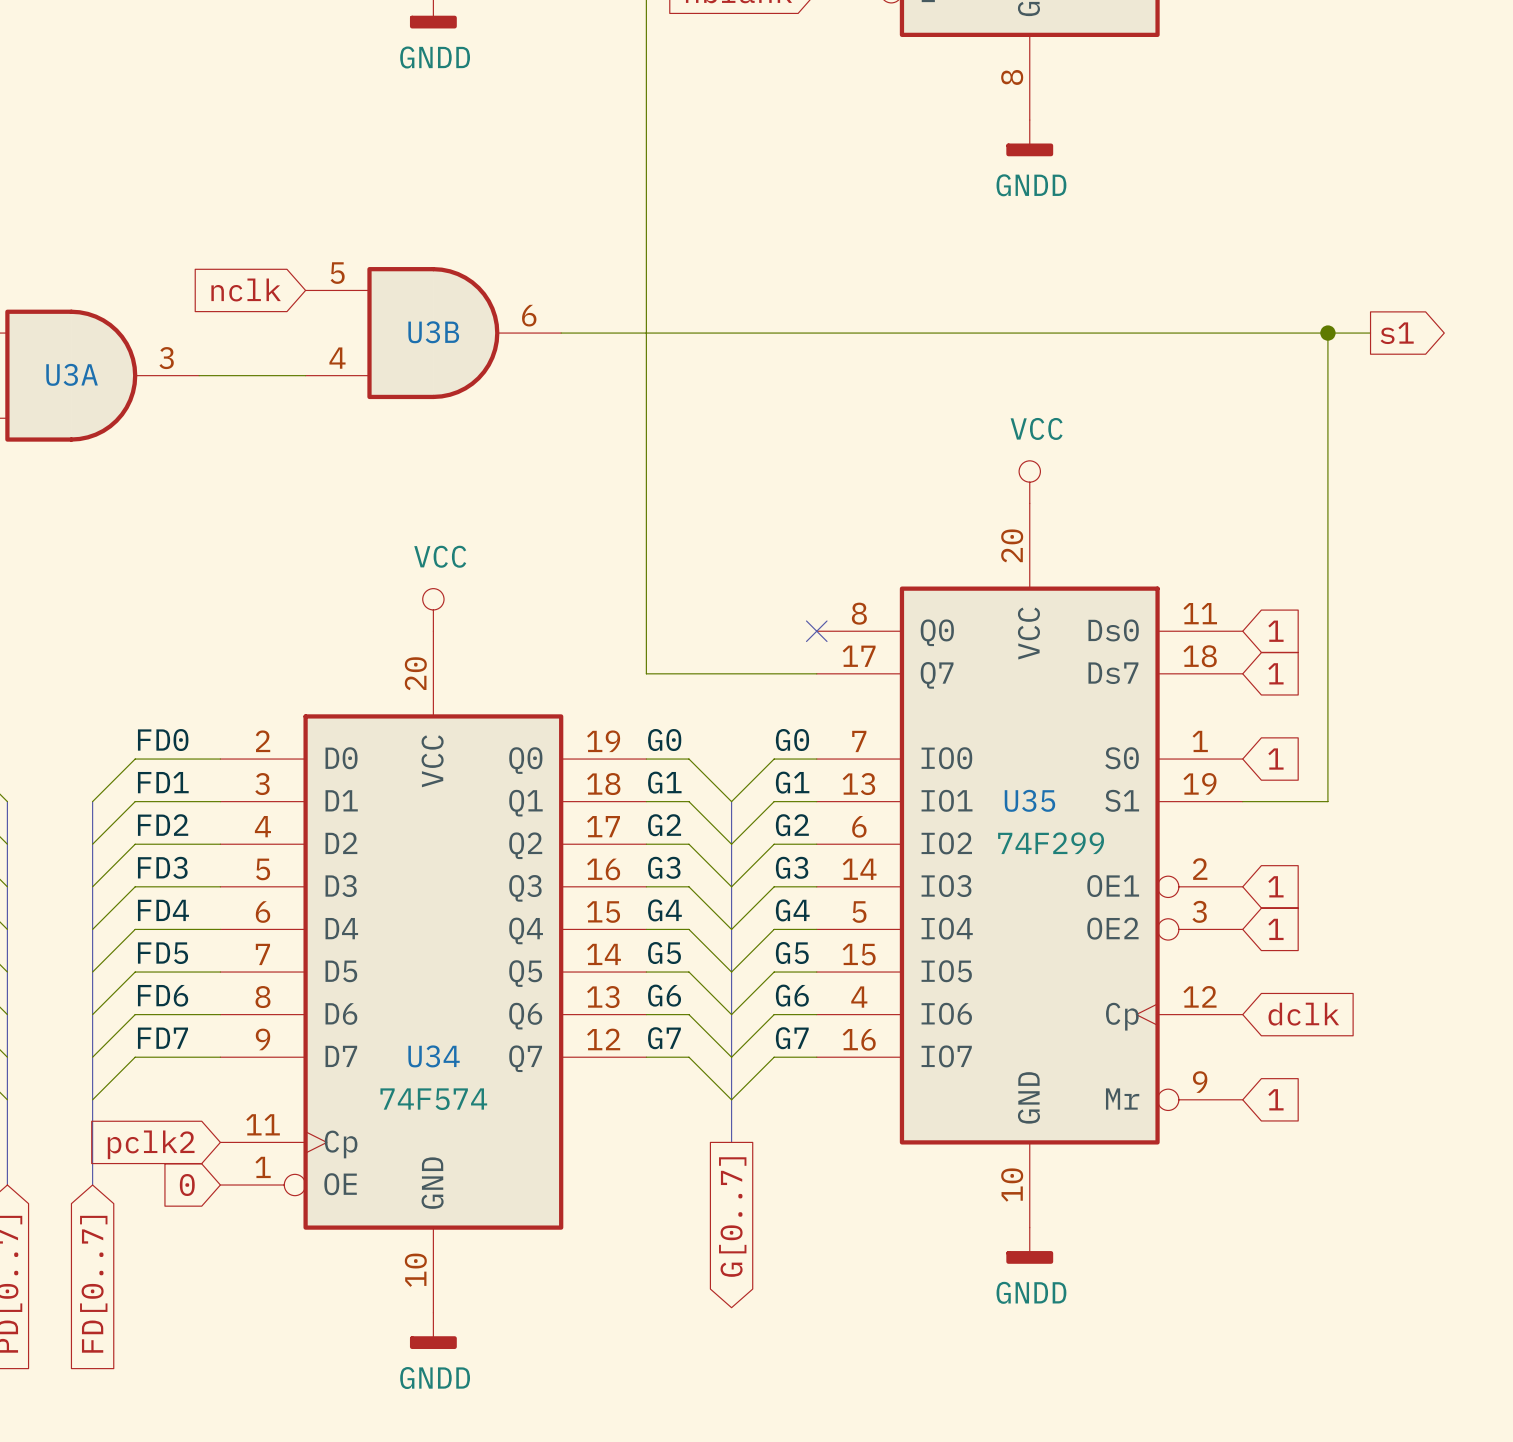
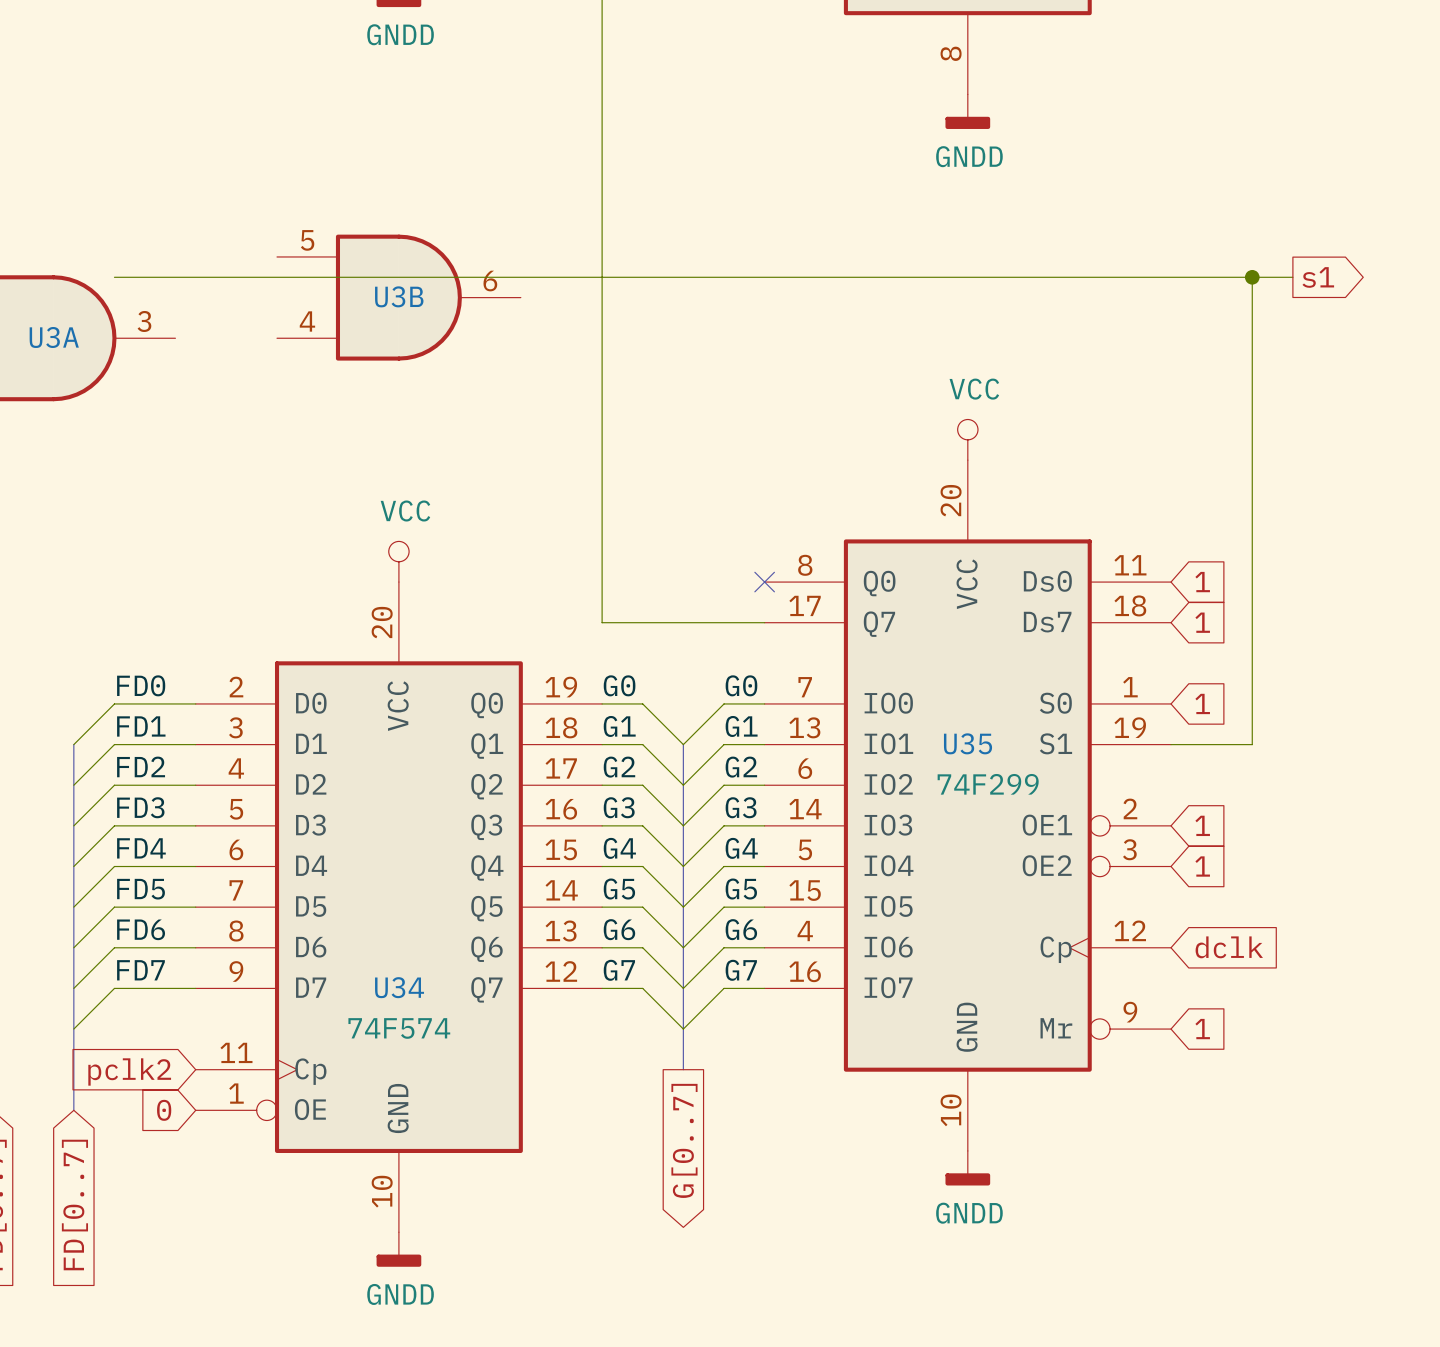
global label: nclk (246, 289) -> none
wire: none -> (114, 277) (1292, 277)
wire: none -> (1252, 277) (1252, 297)
wire: (561, 333) (1370, 333) -> none
junction position: (1327, 333) -> (1252, 277)
global label position: s1 (1397, 333) -> s1 (1318, 277)
wire: (199, 375) (305, 375) -> none

